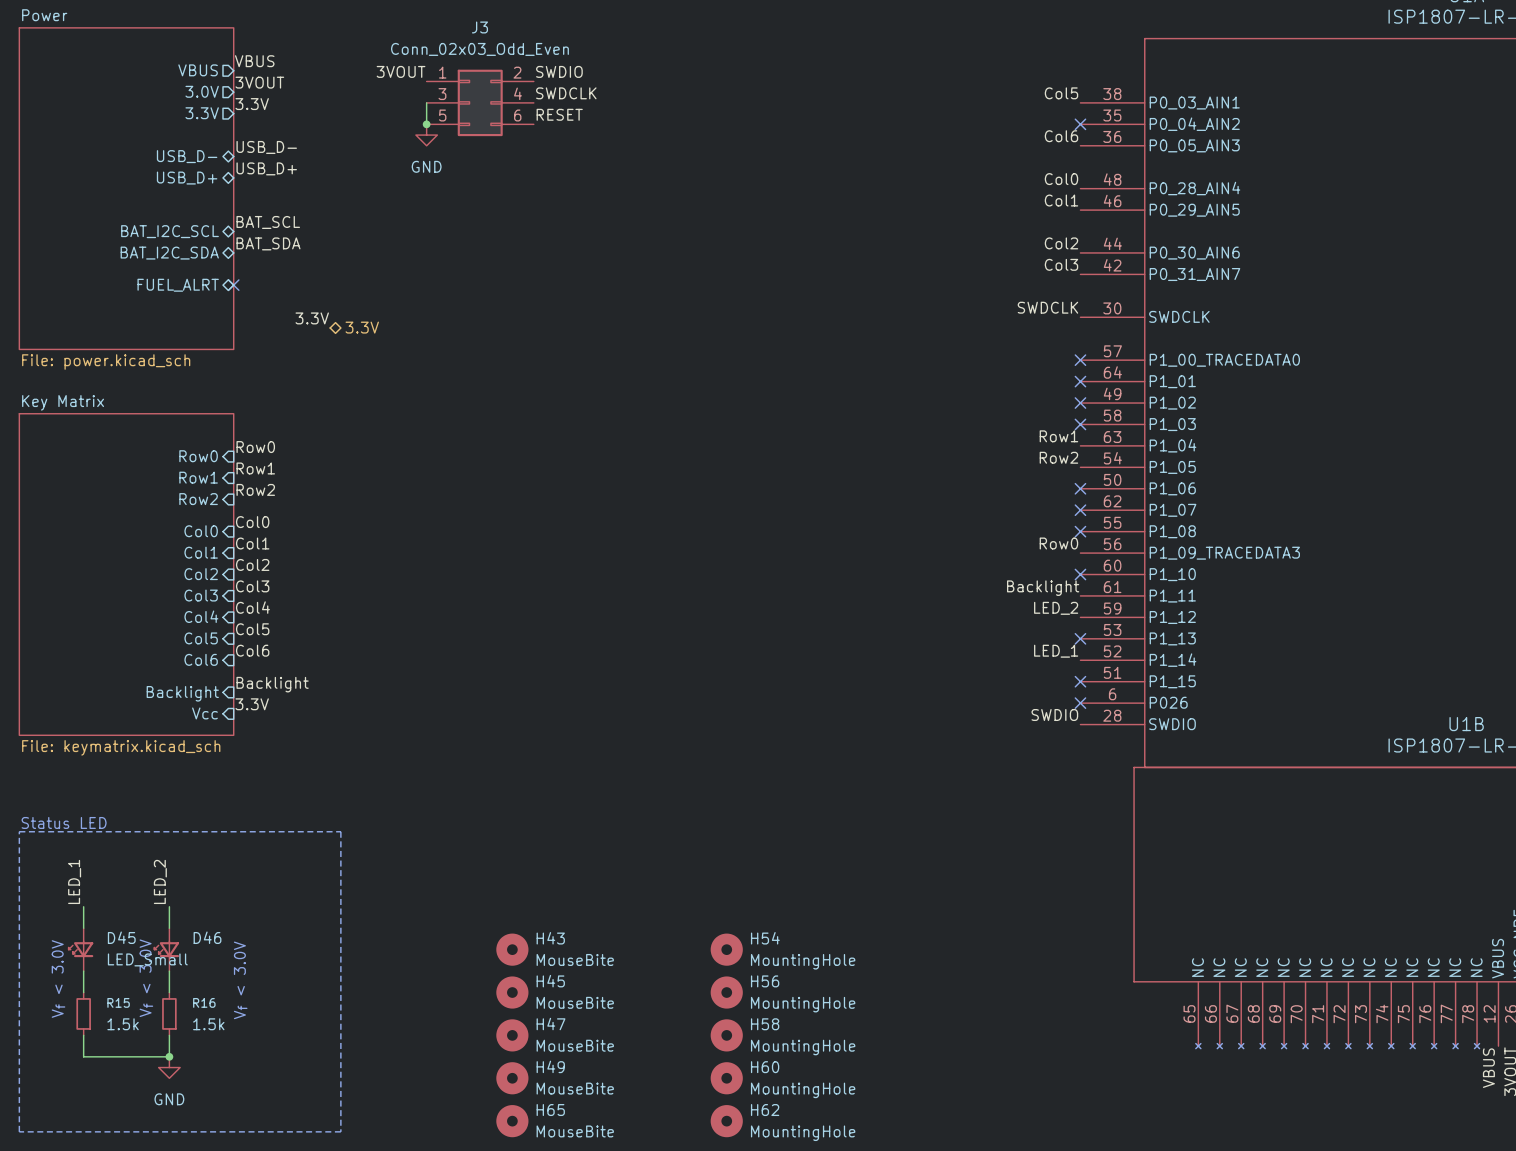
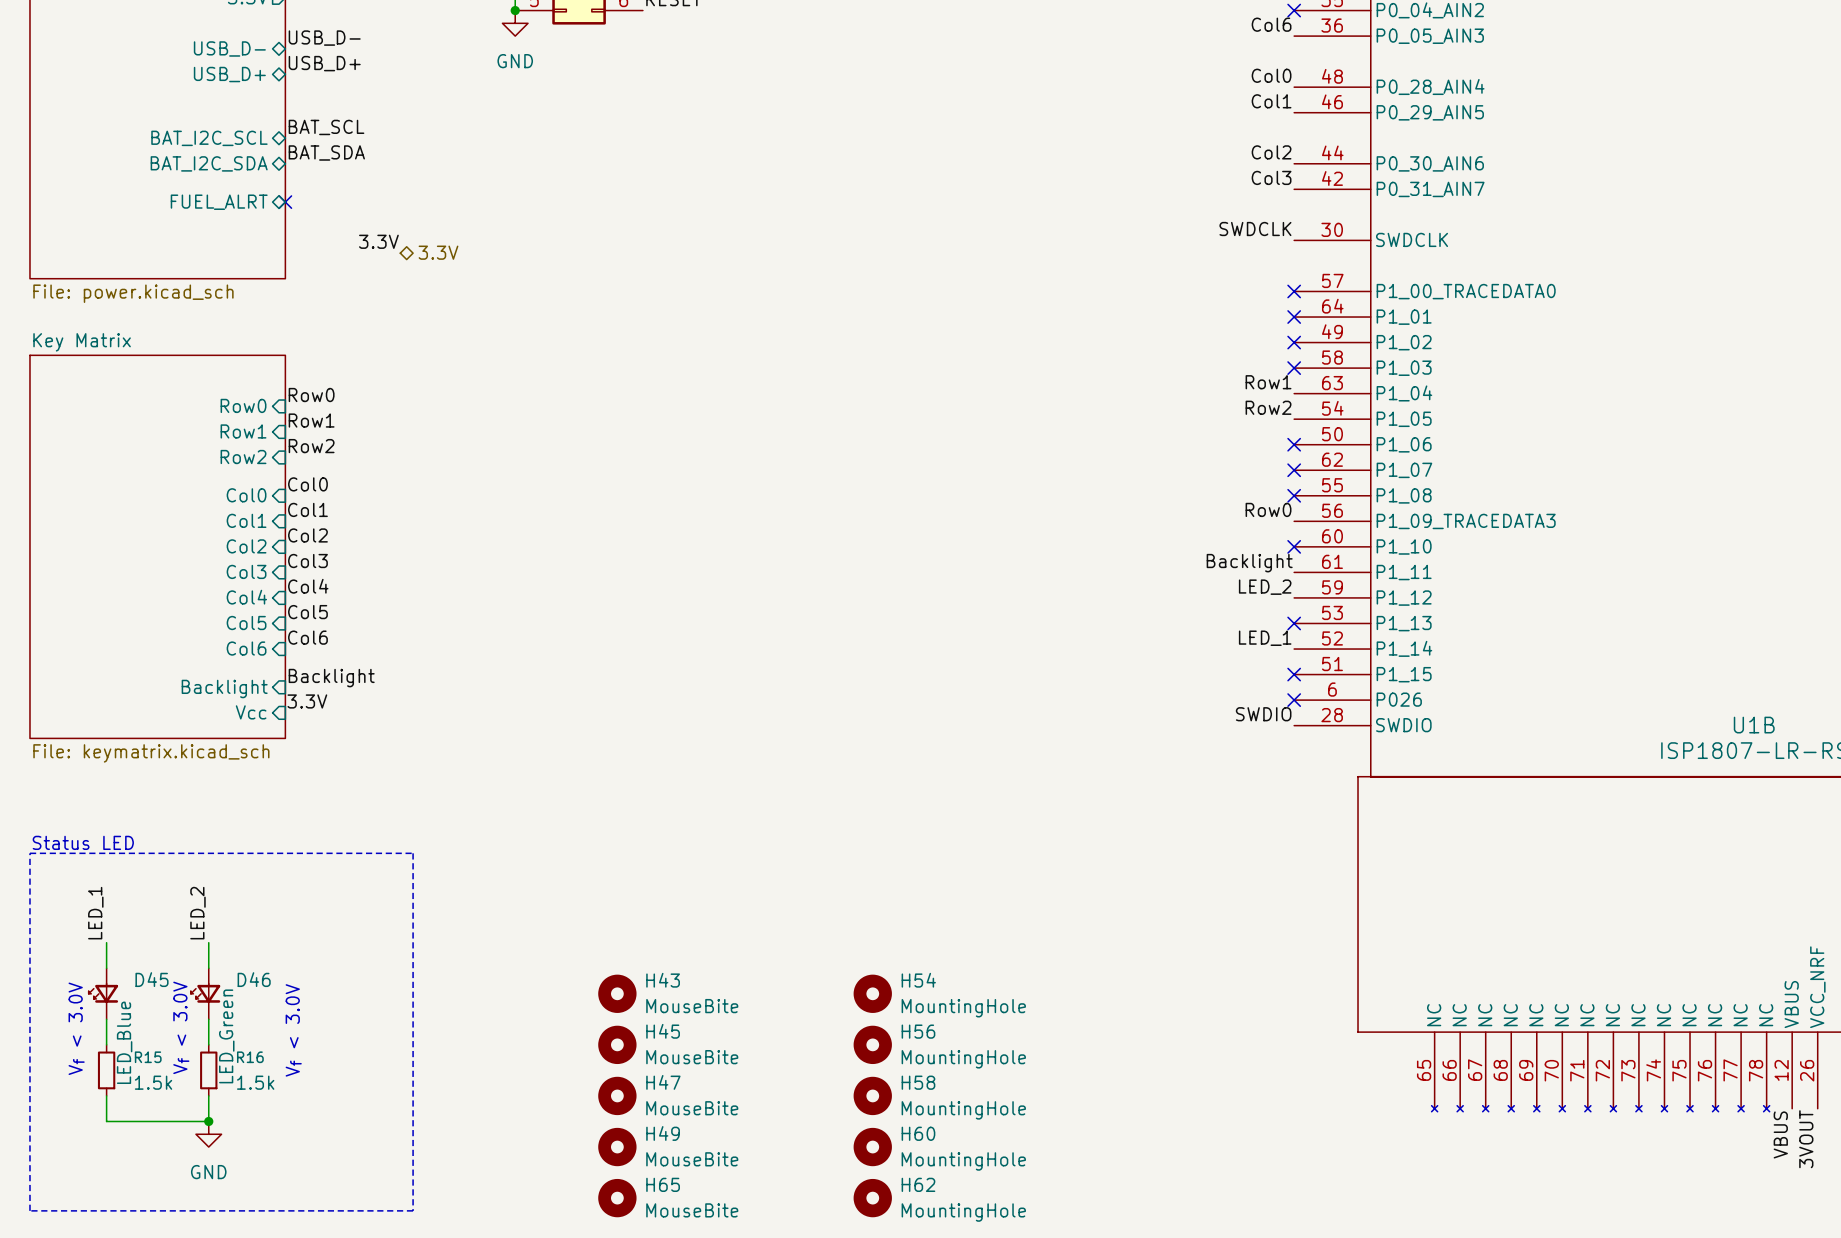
D45 value: LED_Small (147, 959) -> LED_Blue (124, 1042)
D46 value: none -> LED_Green (226, 1036)

